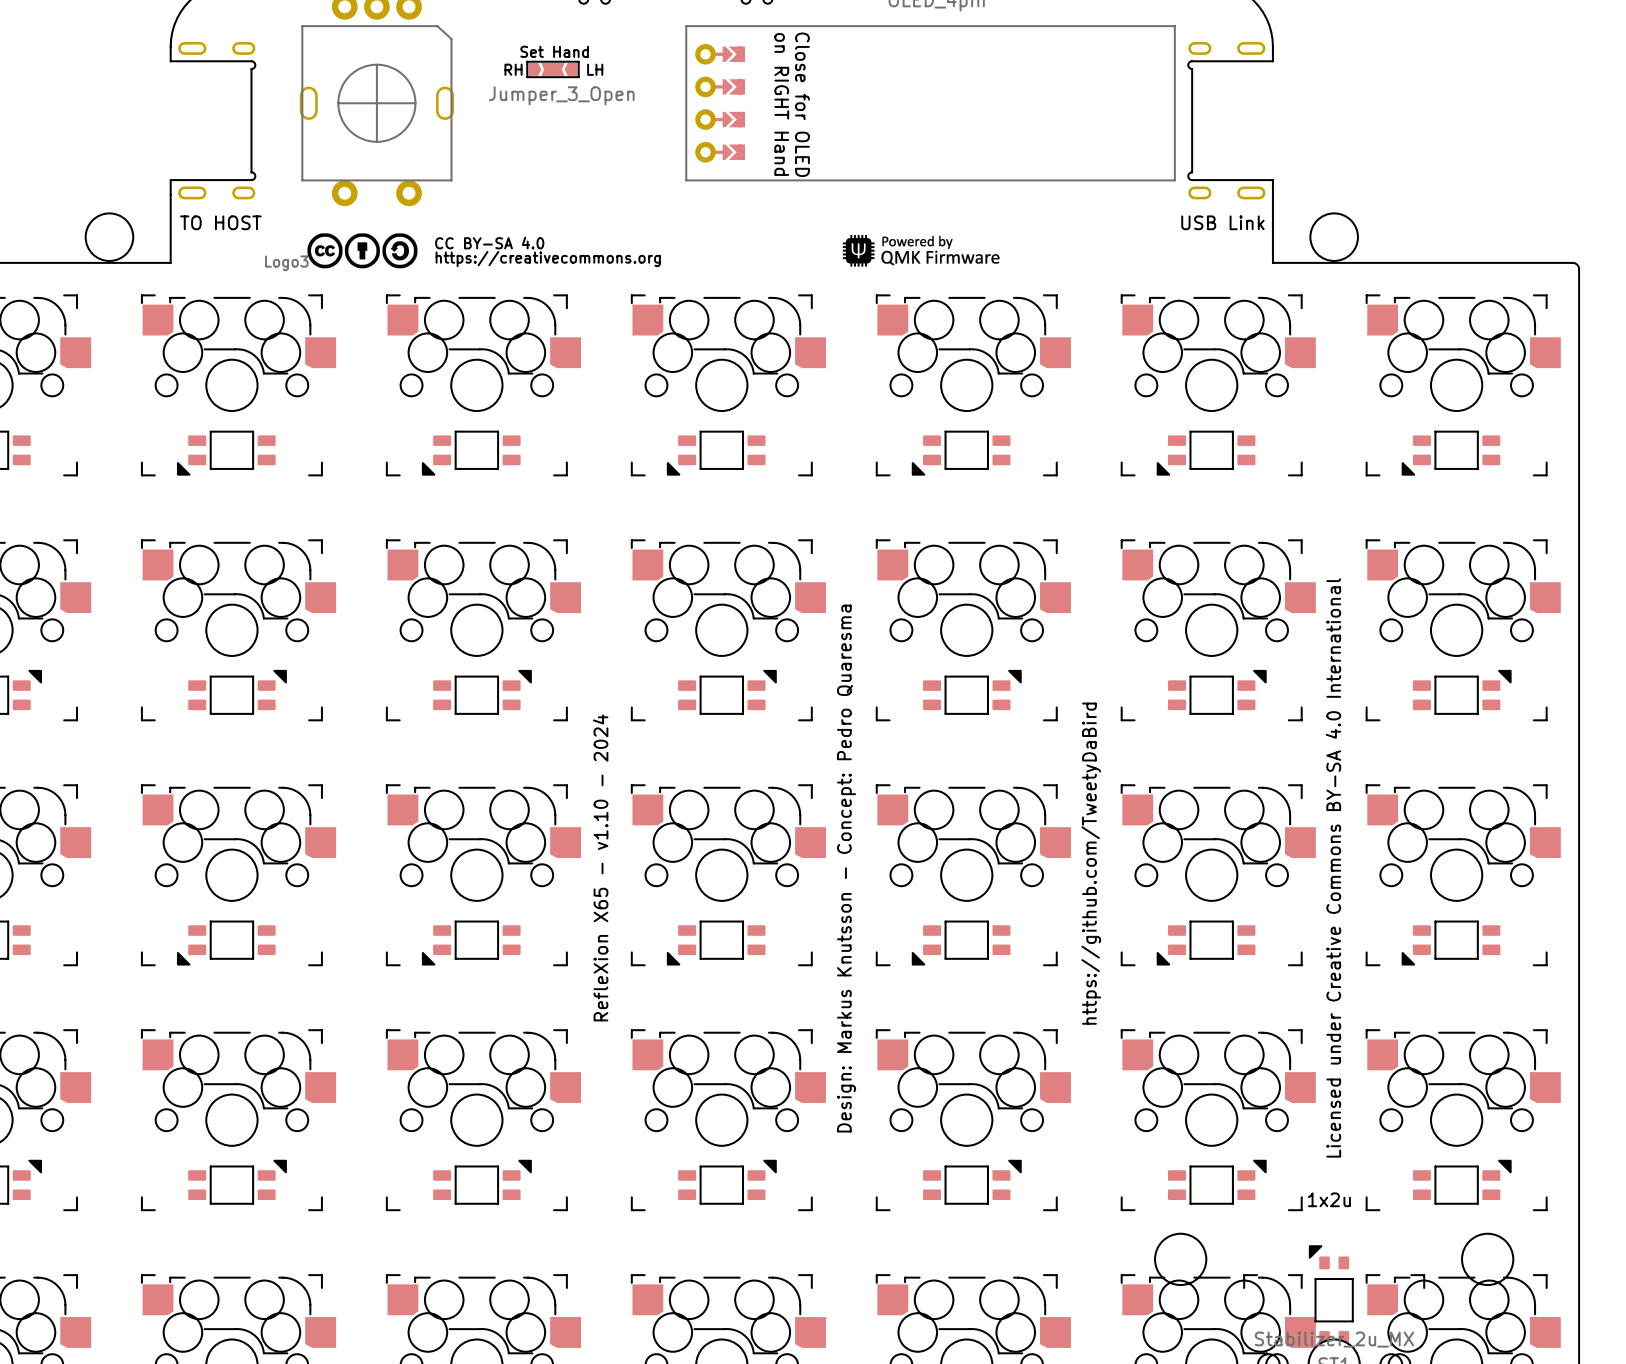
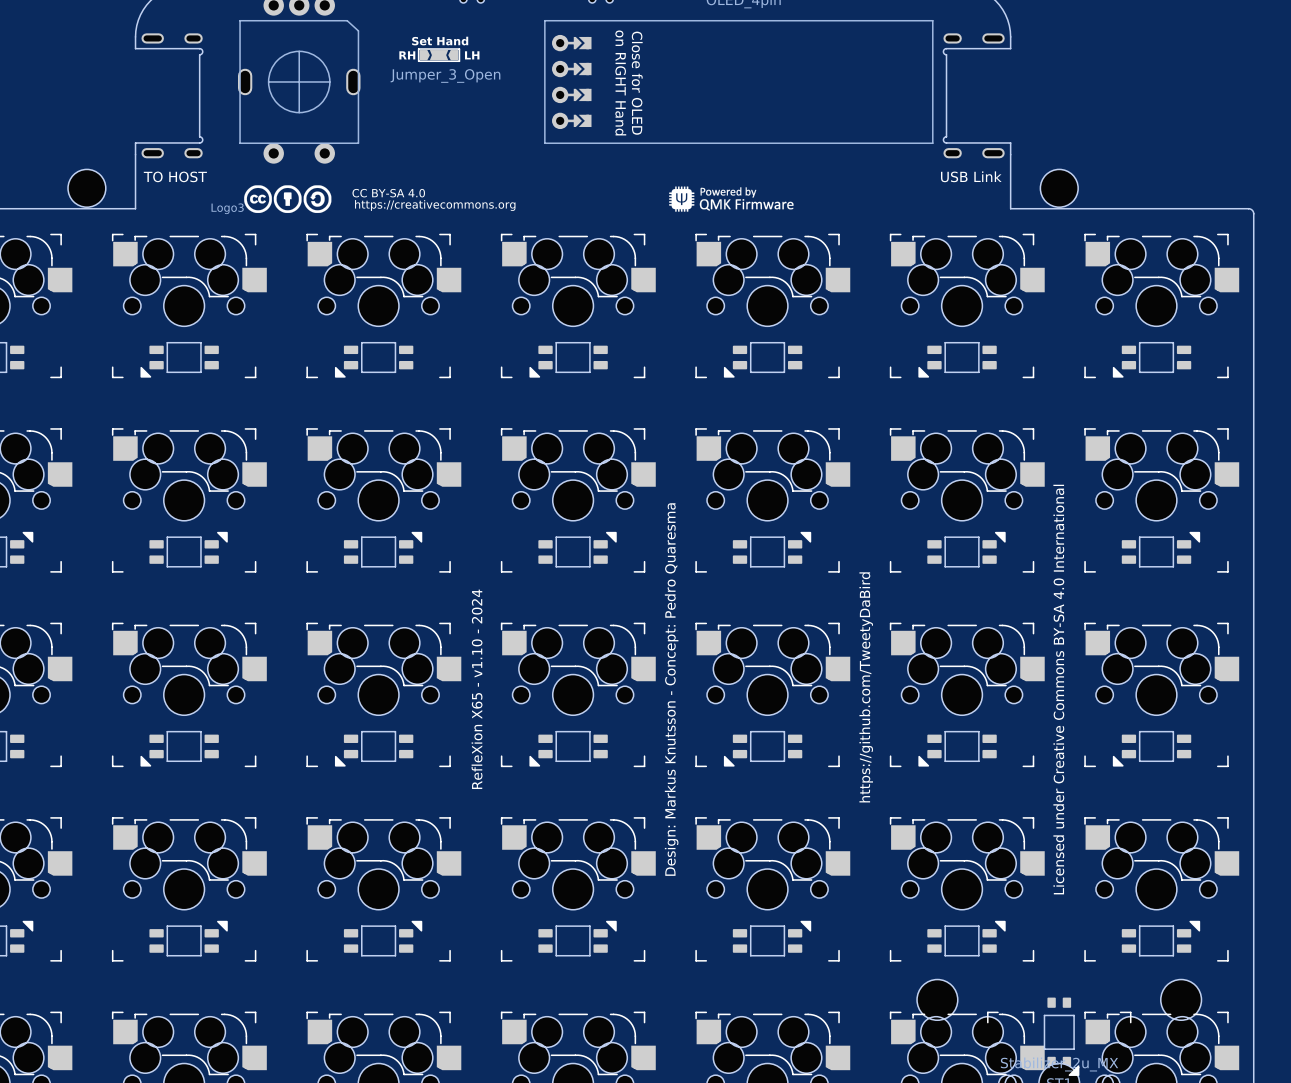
text: 1x2u (1329, 1199) -> none
part rotation: 0° (1331, 1294) -> 180° (1061, 1036)

